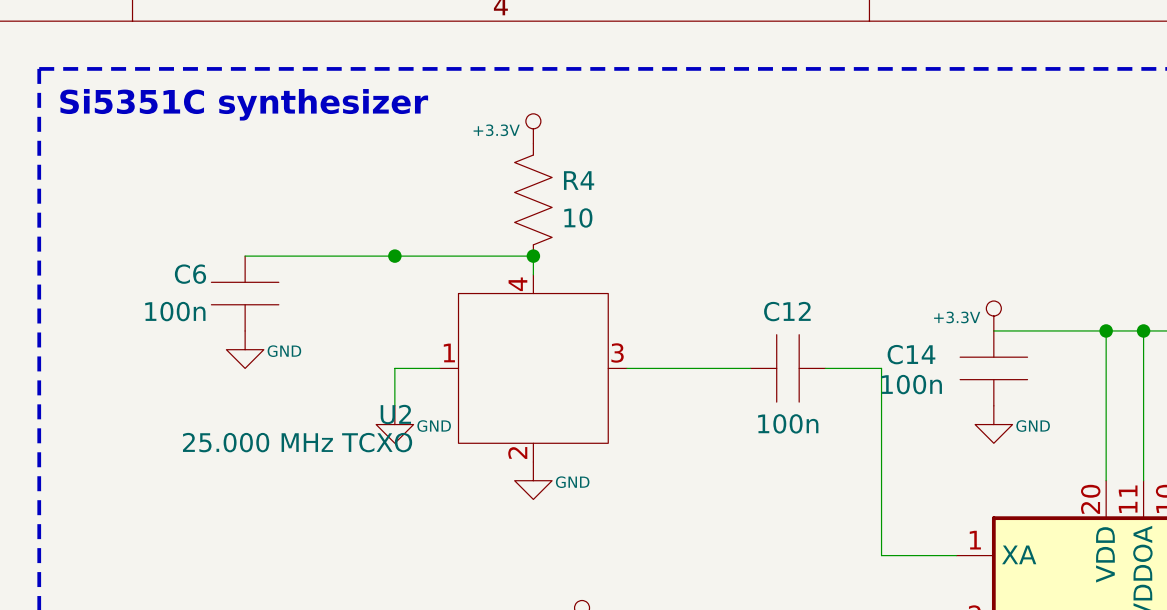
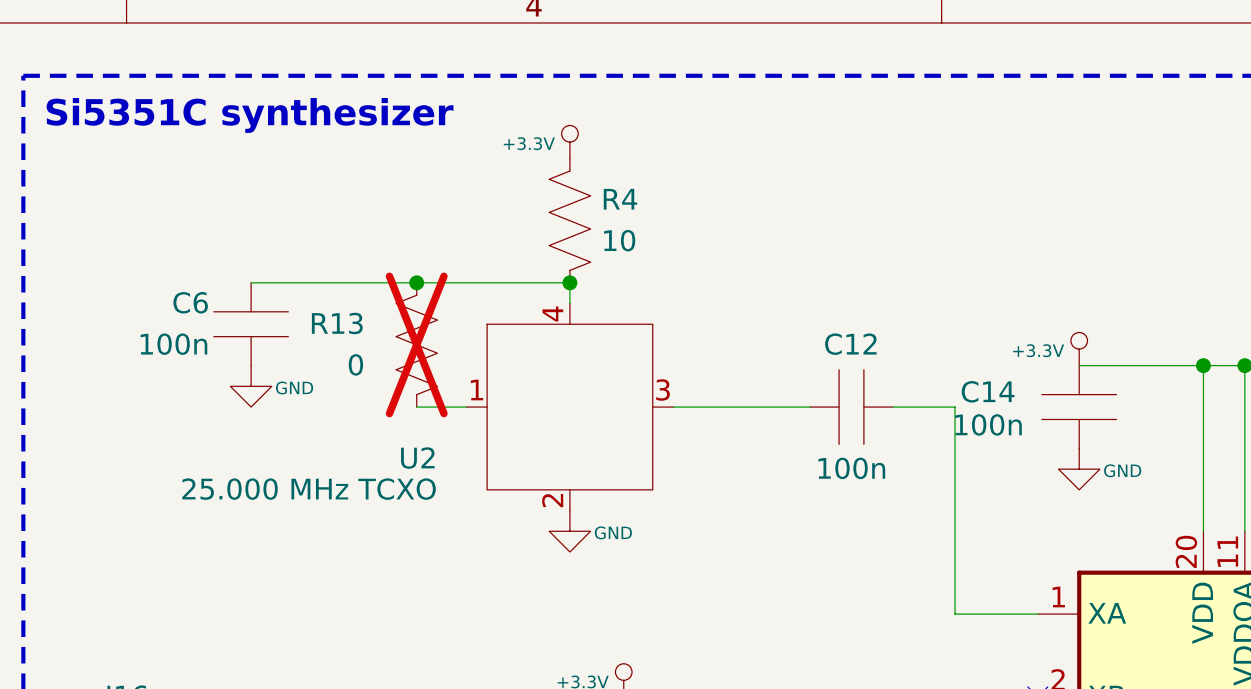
R13: none -> 0 (416, 344)
wire: (394, 368) (394, 405) -> none
power symbol: GND (394, 424) -> none

